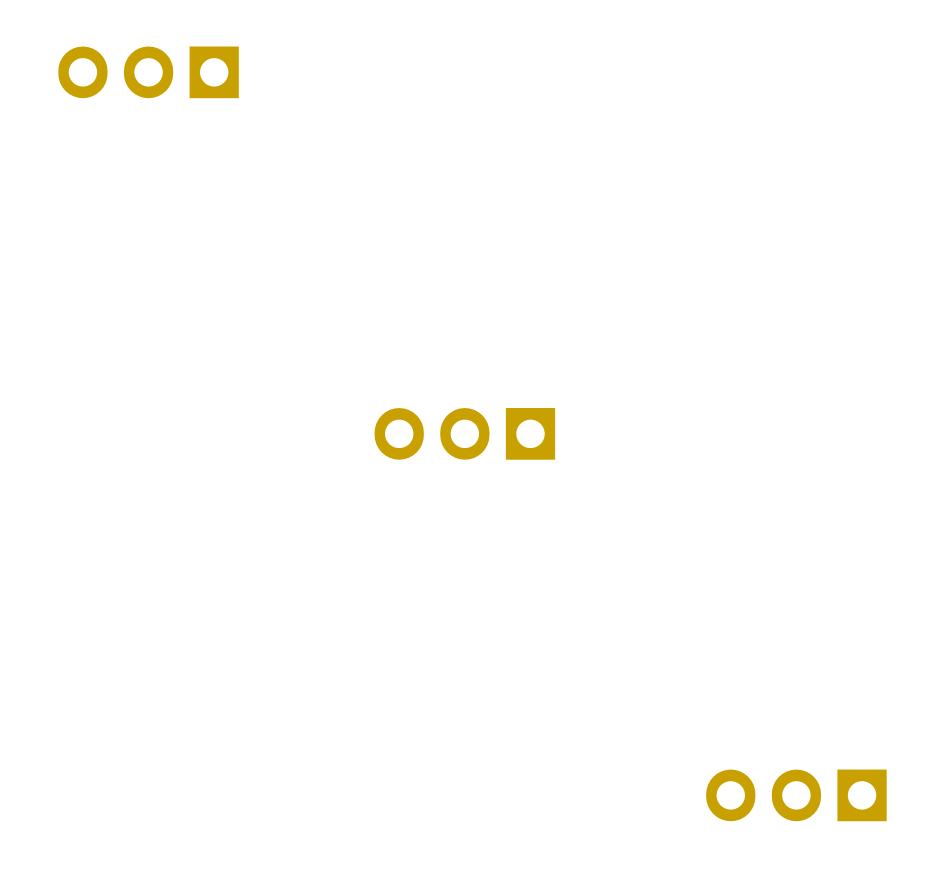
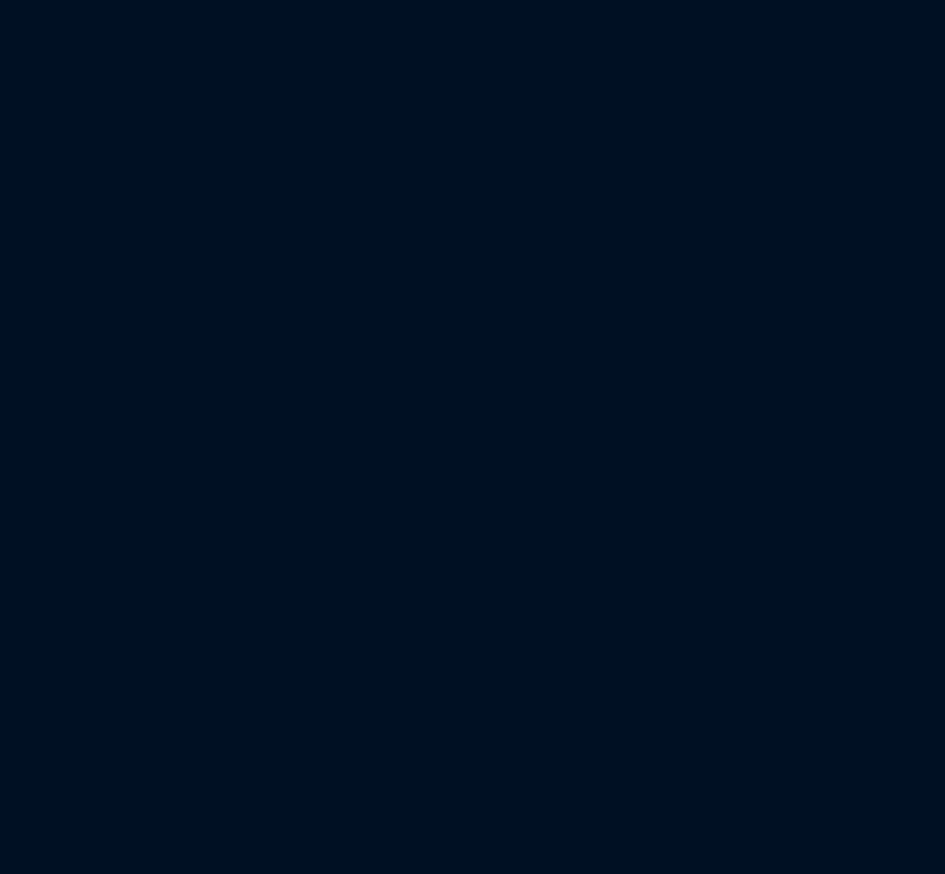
part: (148, 72) -> none
part: (464, 433) -> none
part: (796, 795) -> none

